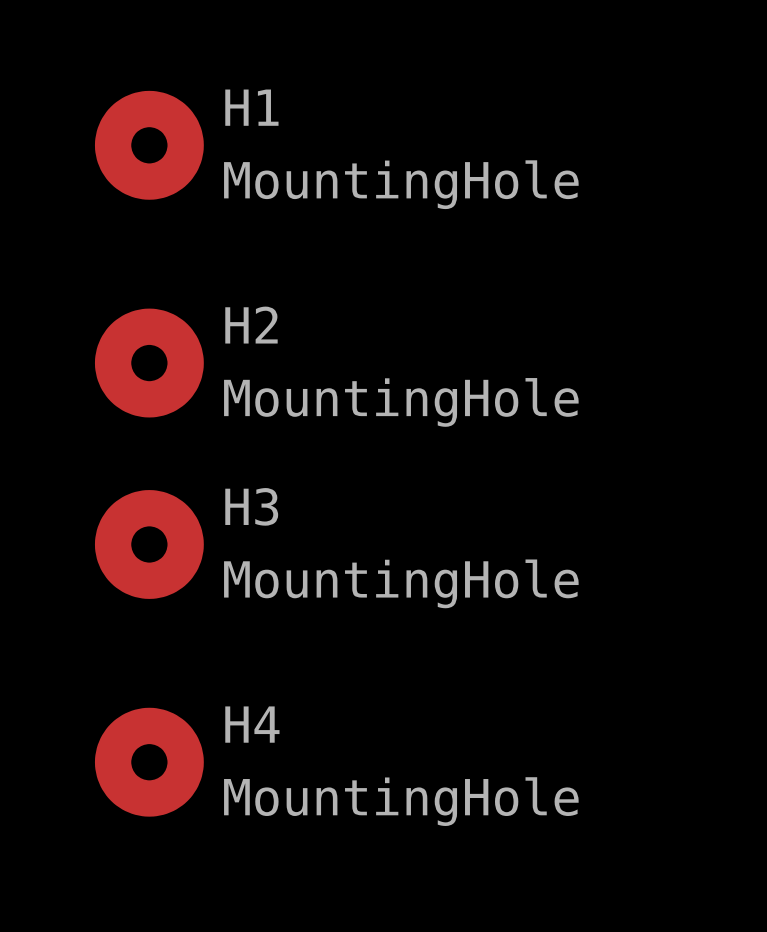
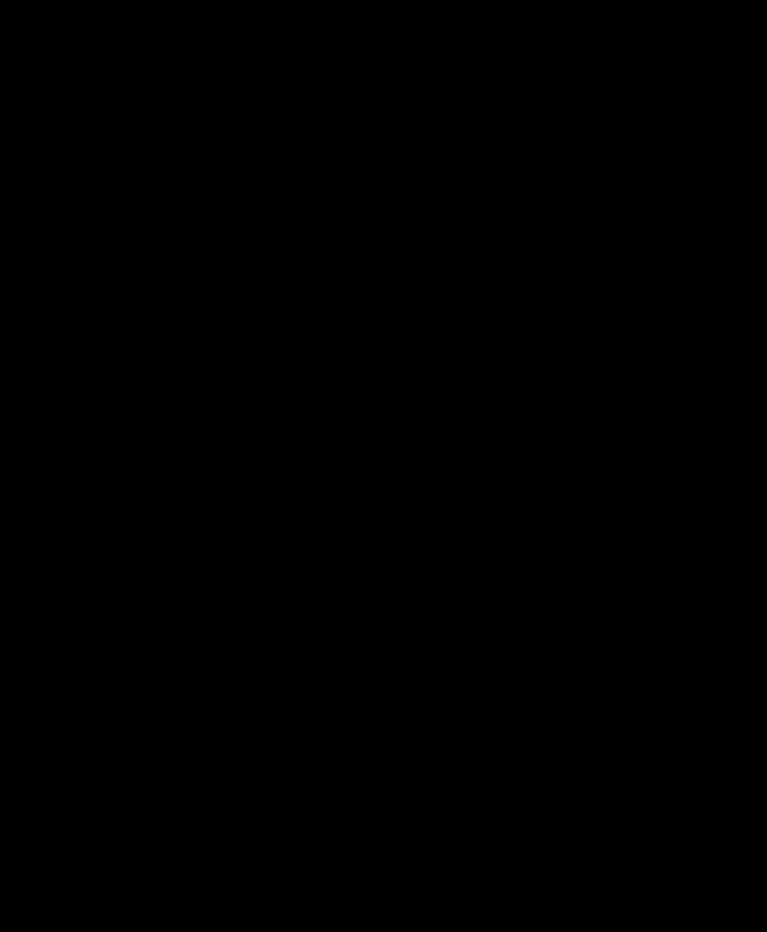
H1: MountingHole (149, 145) -> none
H2: MountingHole (149, 363) -> none
H3: MountingHole (149, 544) -> none
H4: MountingHole (149, 762) -> none

